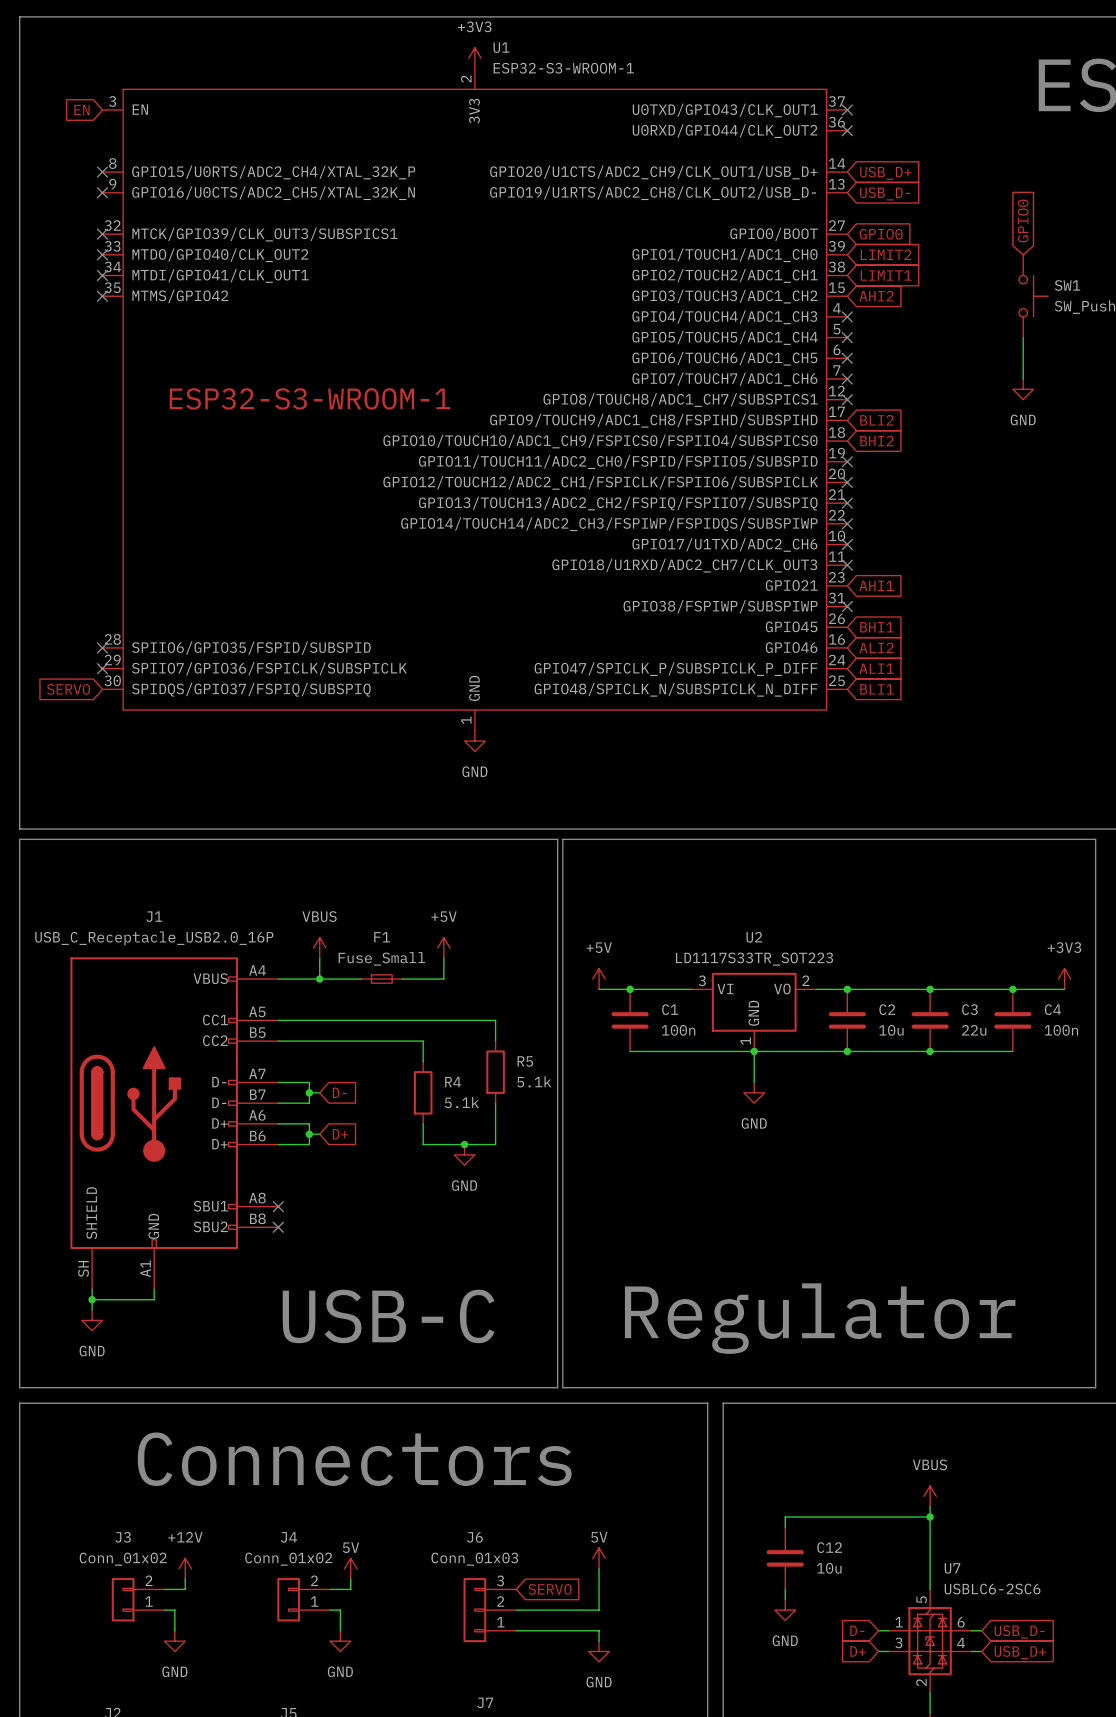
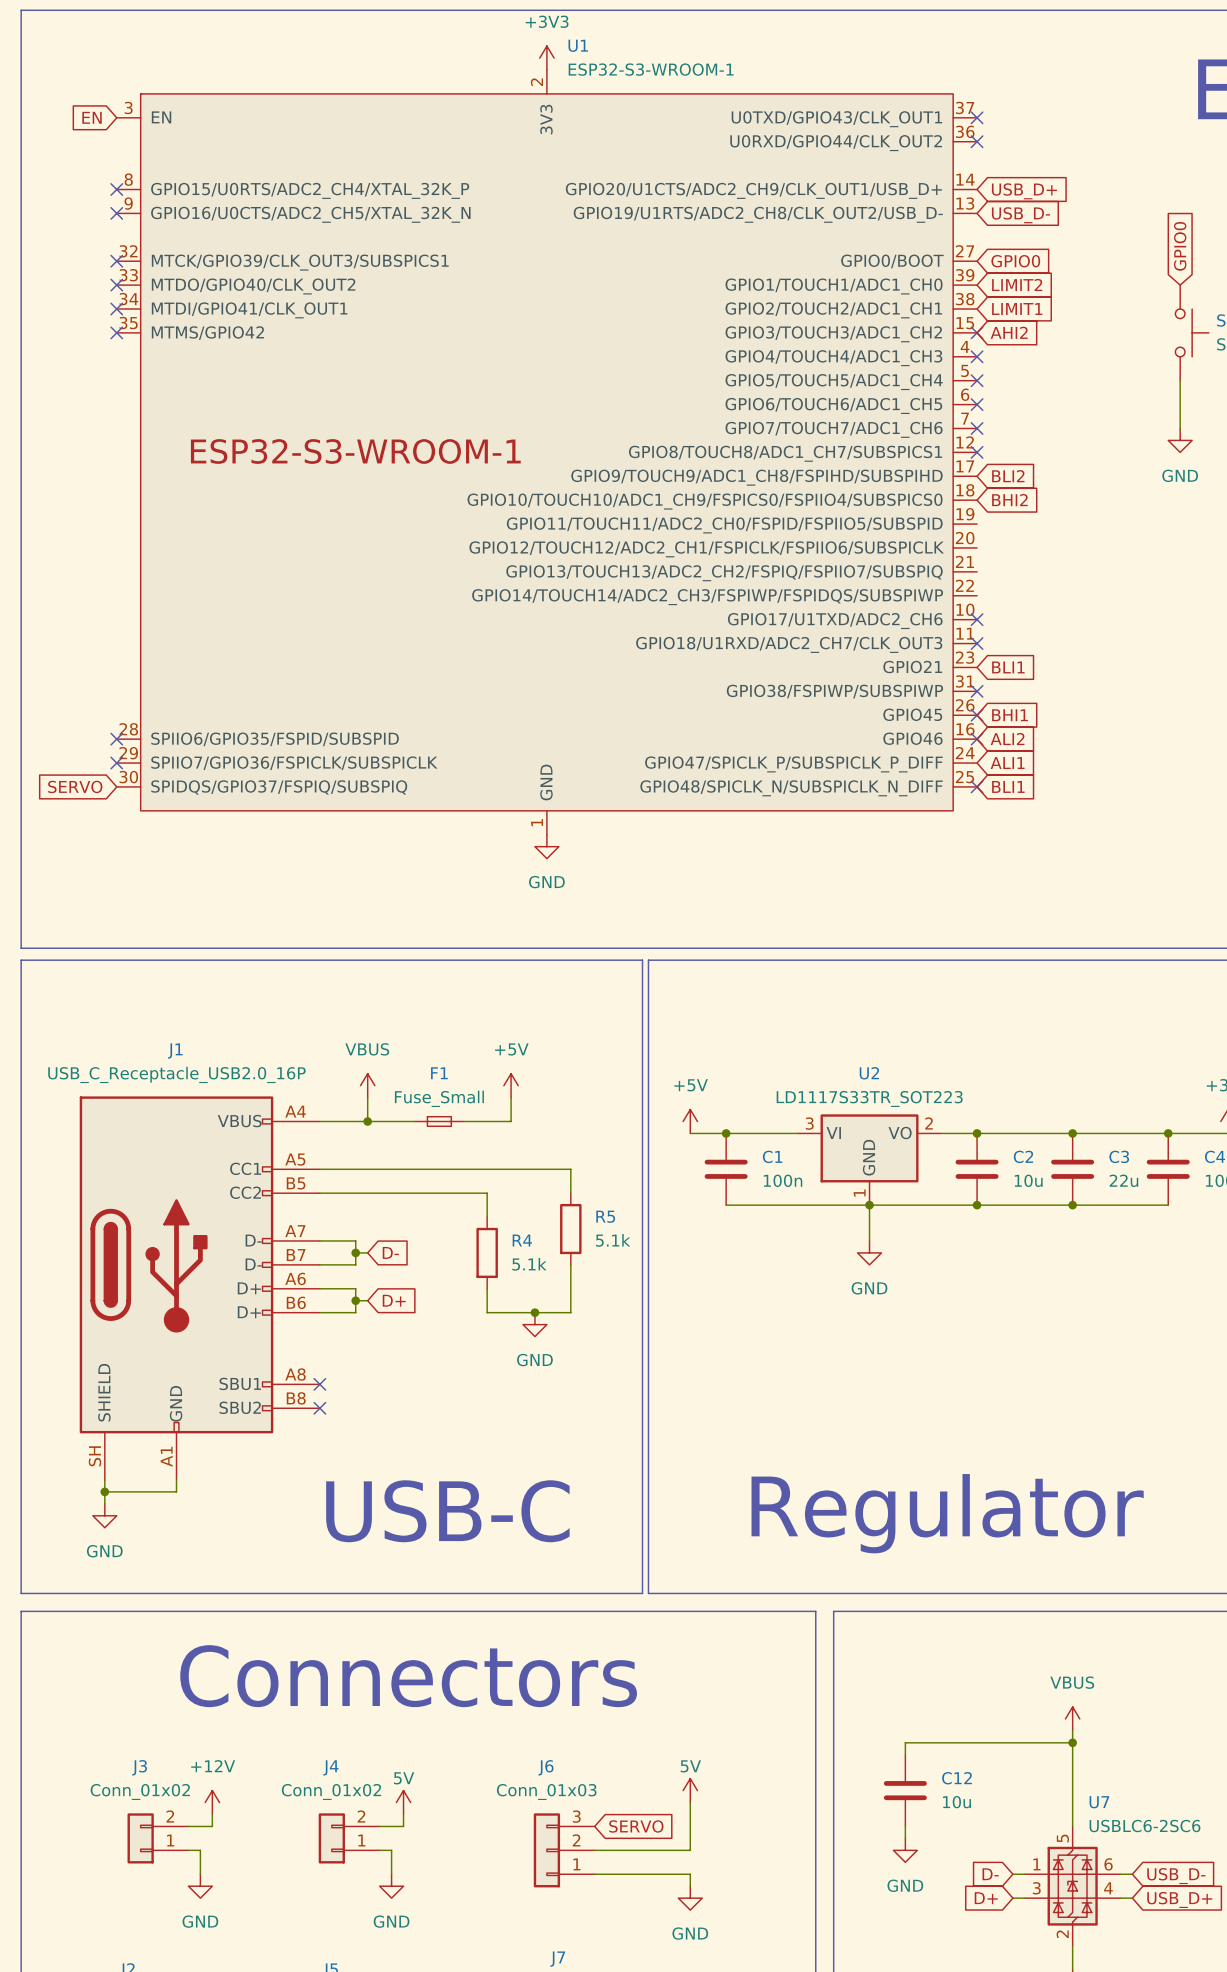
no-connect mark: none -> (977, 332)
no-connect mark: (847, 461) -> none
no-connect mark: (847, 482) -> none
no-connect mark: (847, 503) -> none
no-connect mark: (847, 523) -> none
global label: AHI1 (876, 585) -> BLI1 (1008, 667)
no-connect mark: none -> (977, 715)
no-connect mark: none -> (977, 739)
no-connect mark: none -> (977, 786)

